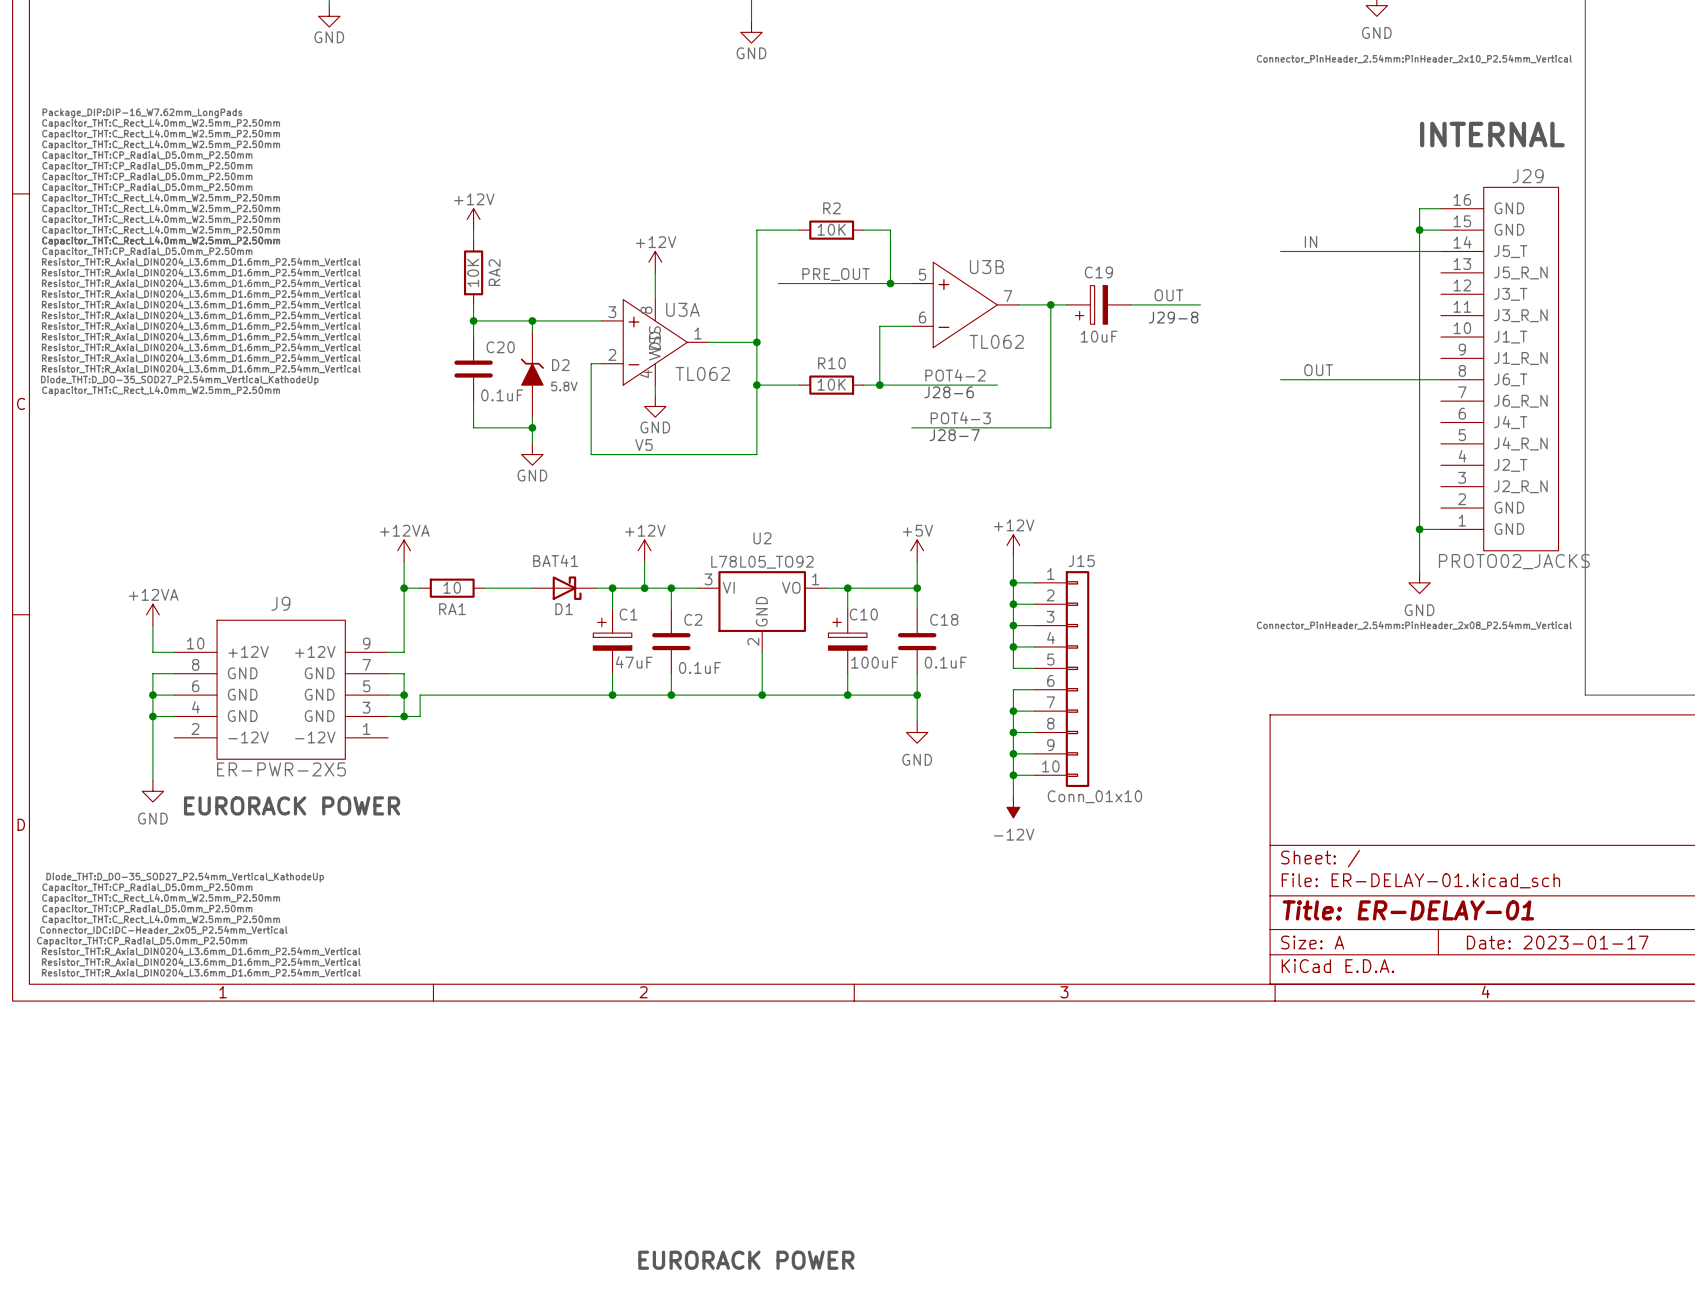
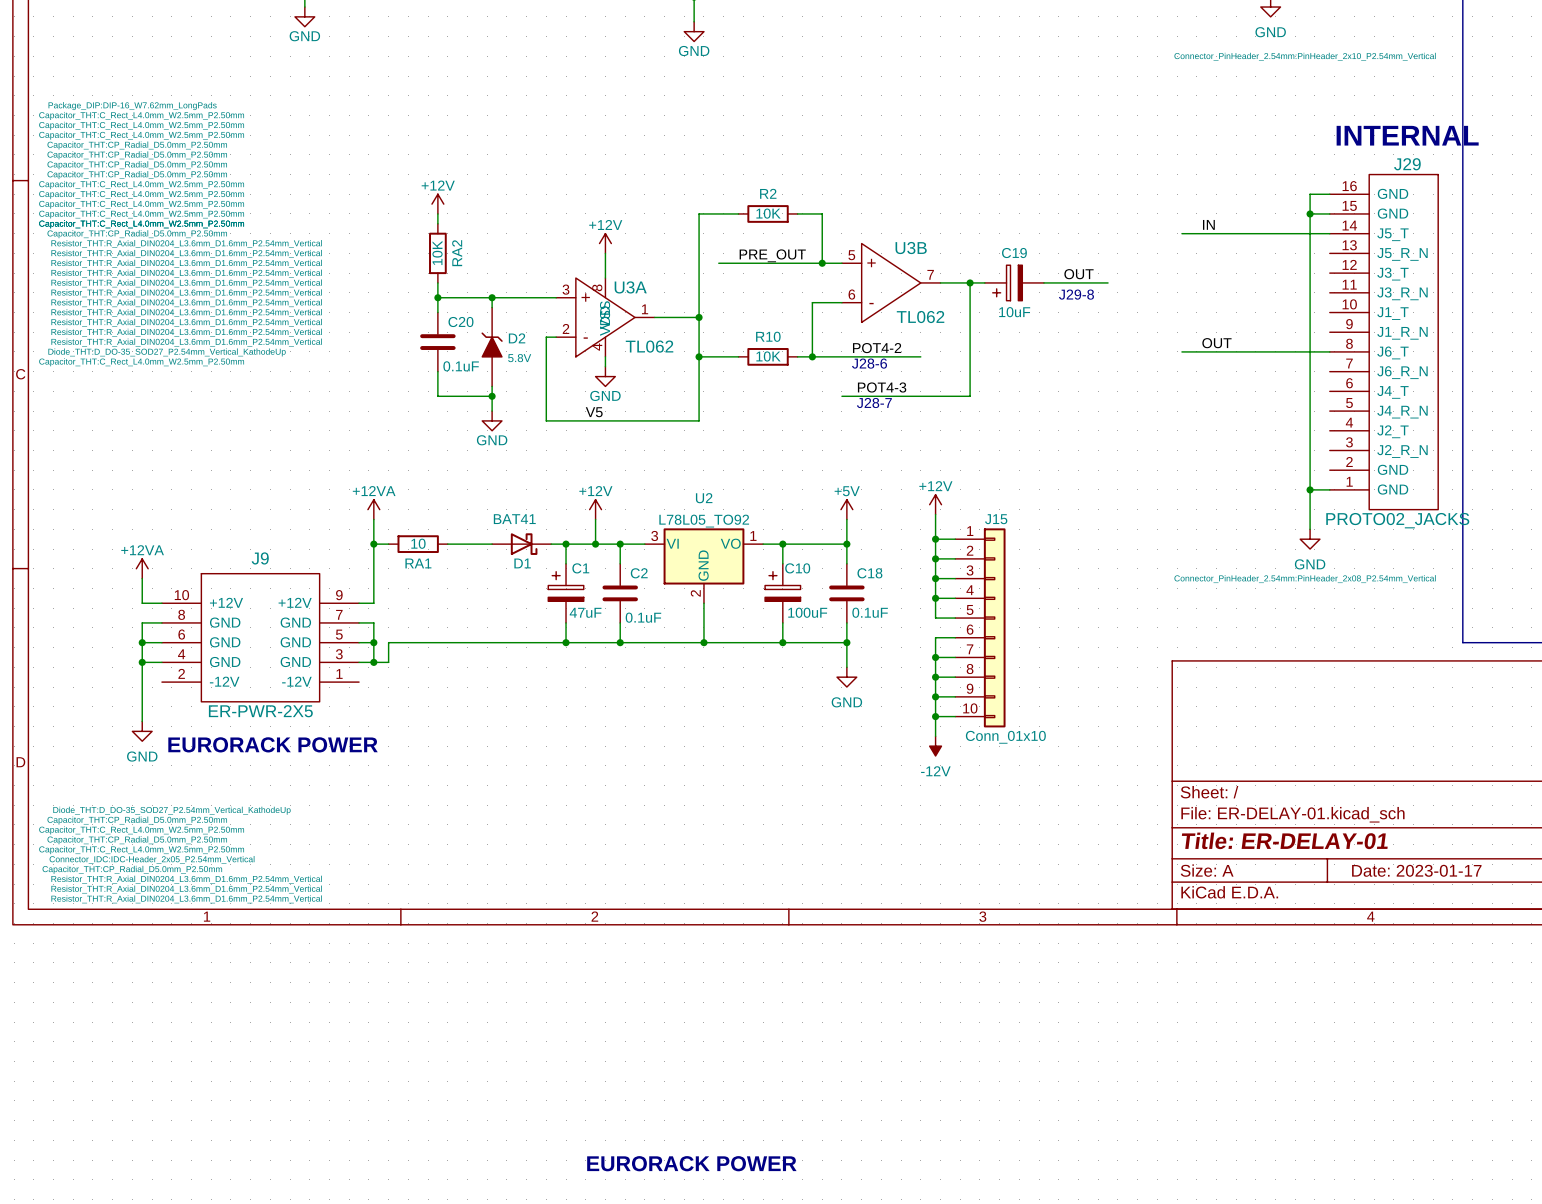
text position: INTERNAL (1492, 134) -> INTERNAL (1407, 135)

